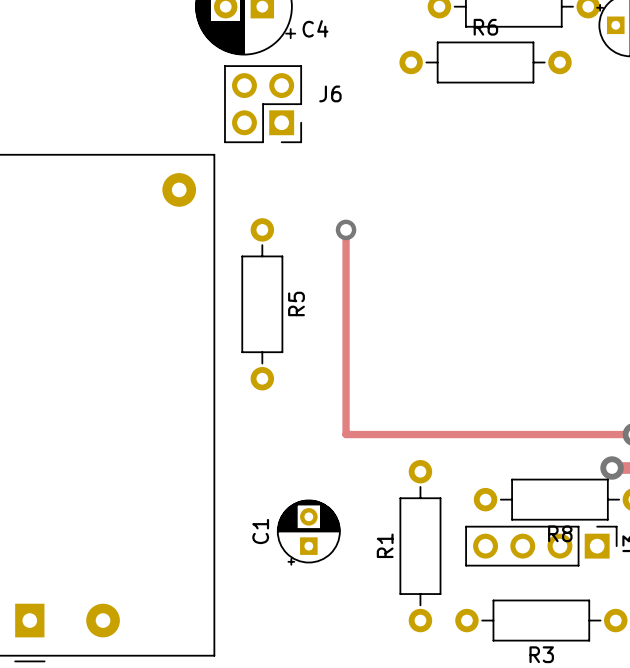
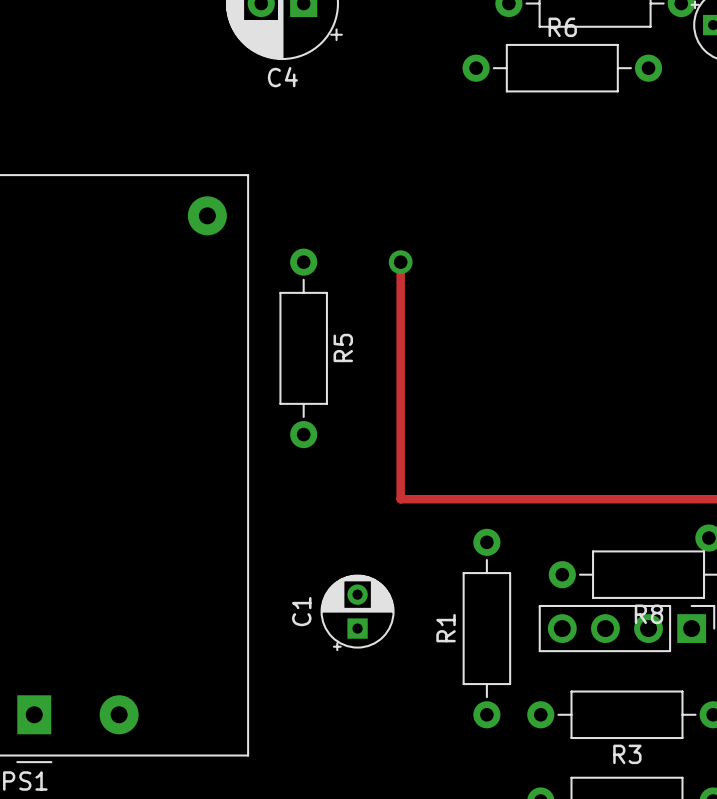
C4 name position: C4 (315, 28) -> C4 (282, 77)
J6: (263, 104) -> none

